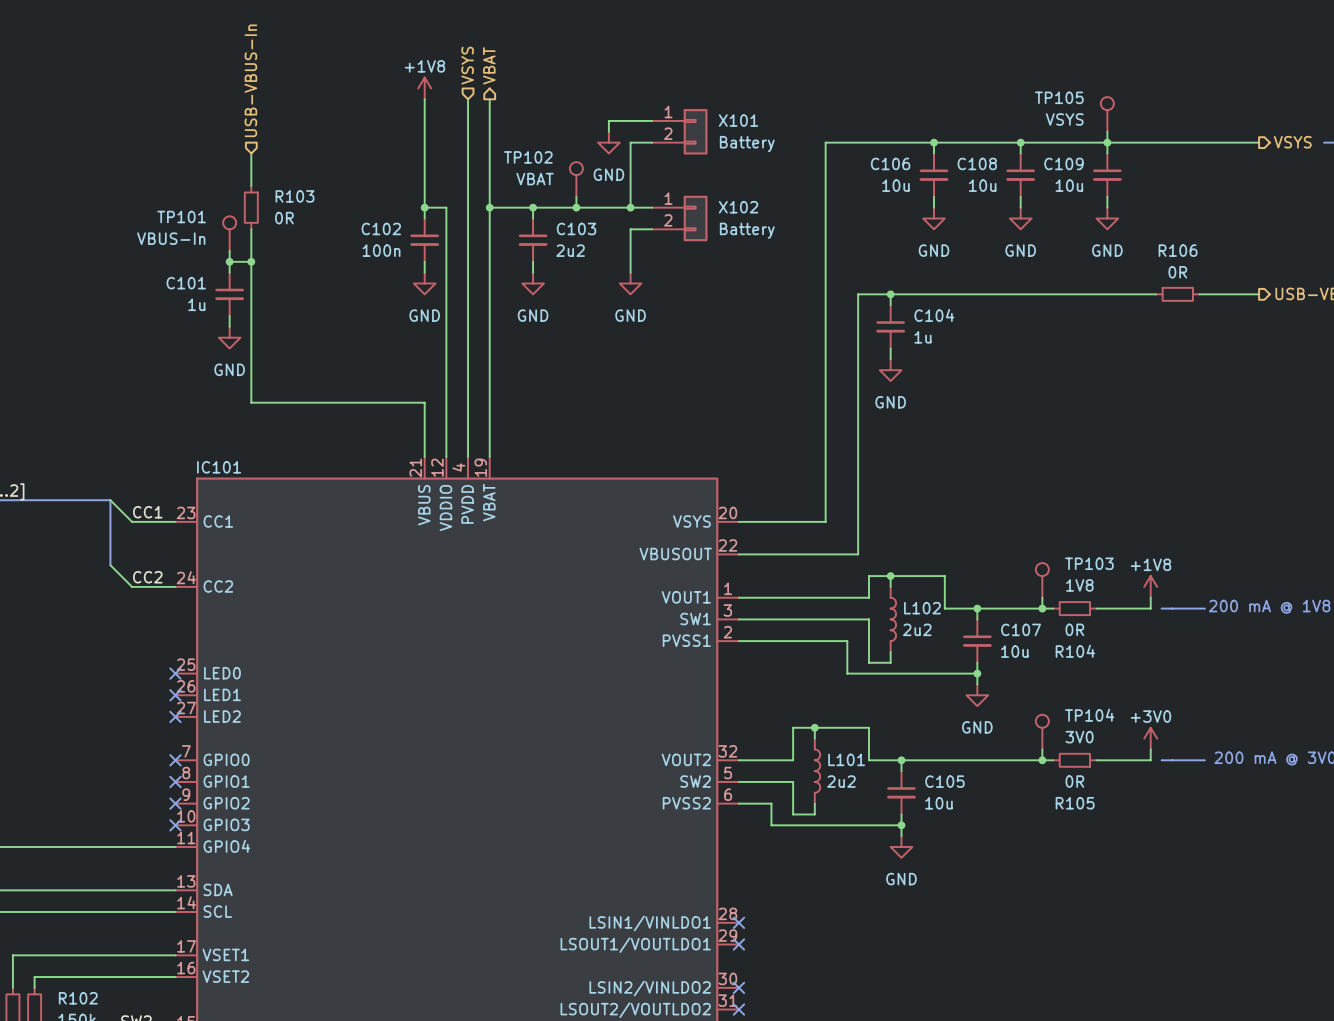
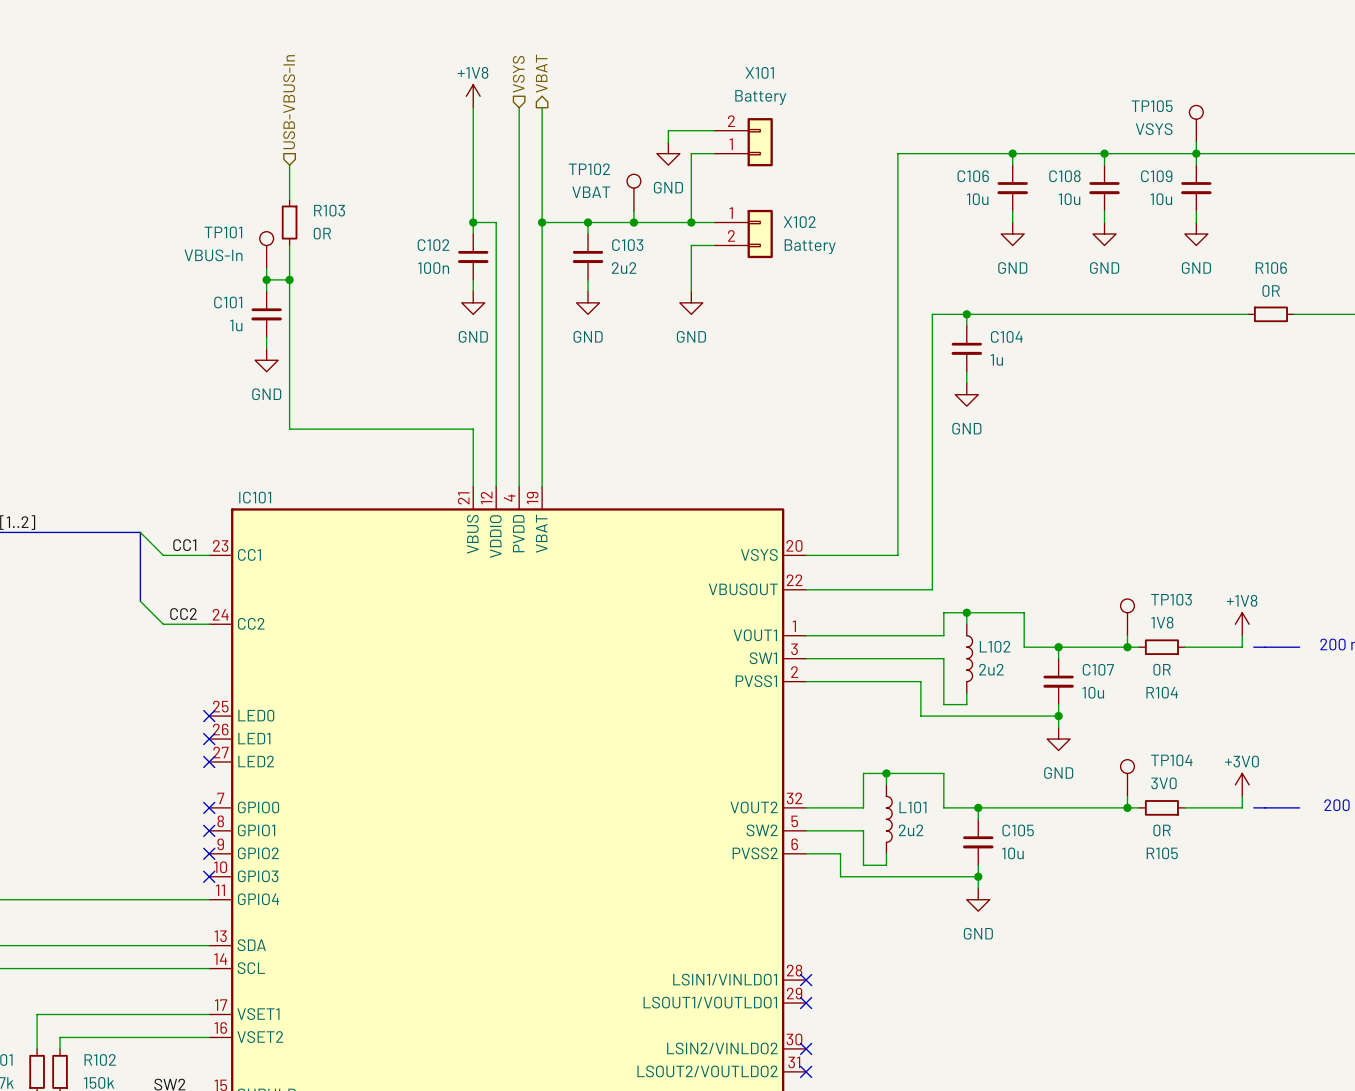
X101 name position: X101 (738, 120) -> X101 (759, 72)
X101 flip: as is (695, 131) -> up-down (760, 142)
X101 value position: Battery (747, 144) -> Battery (760, 97)

